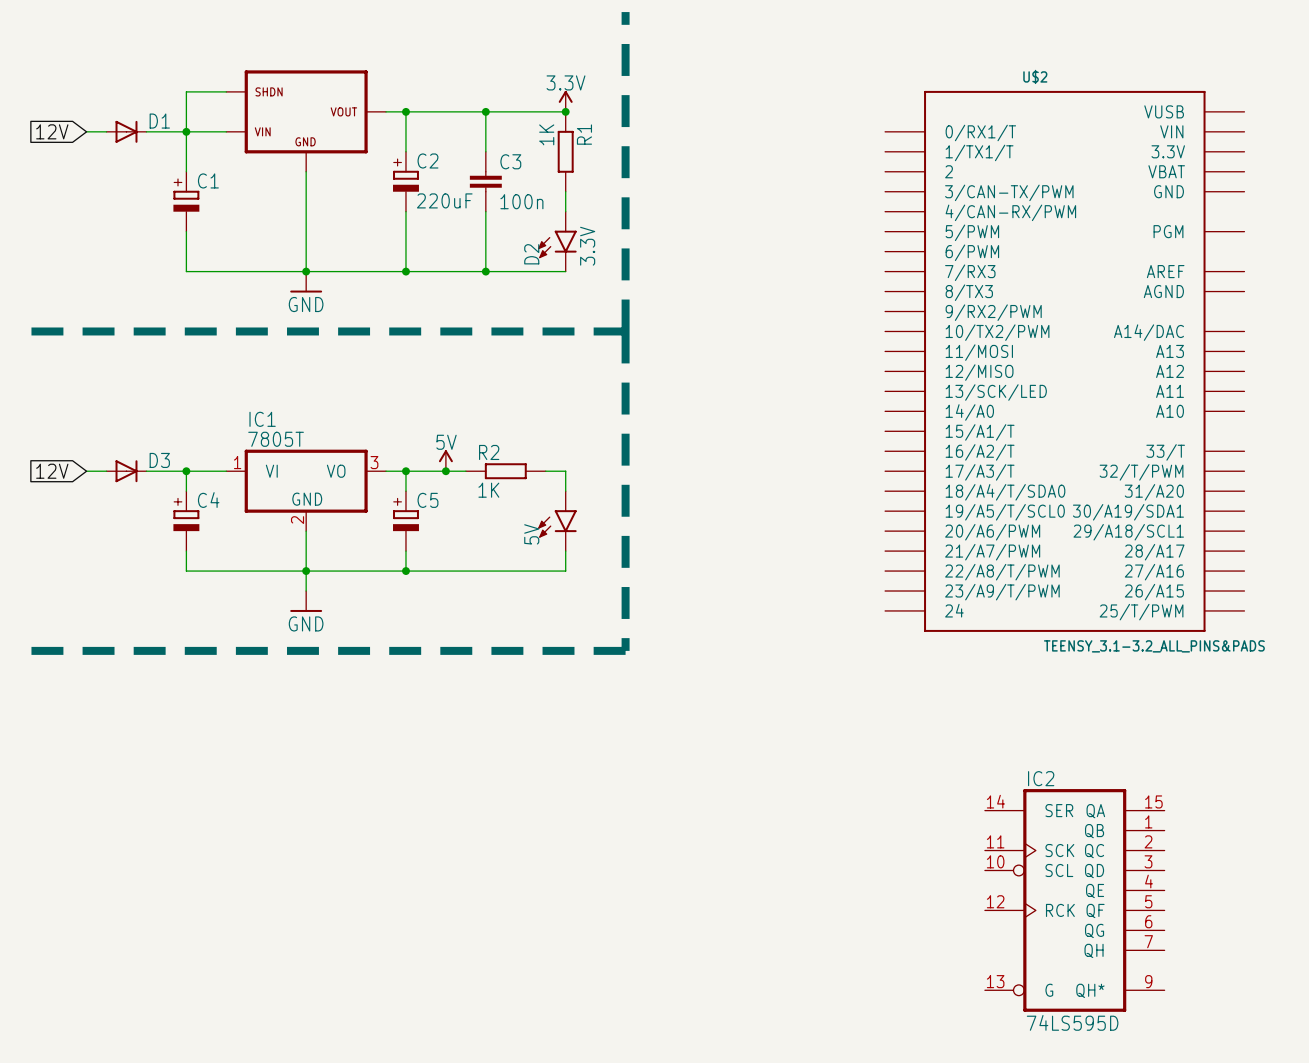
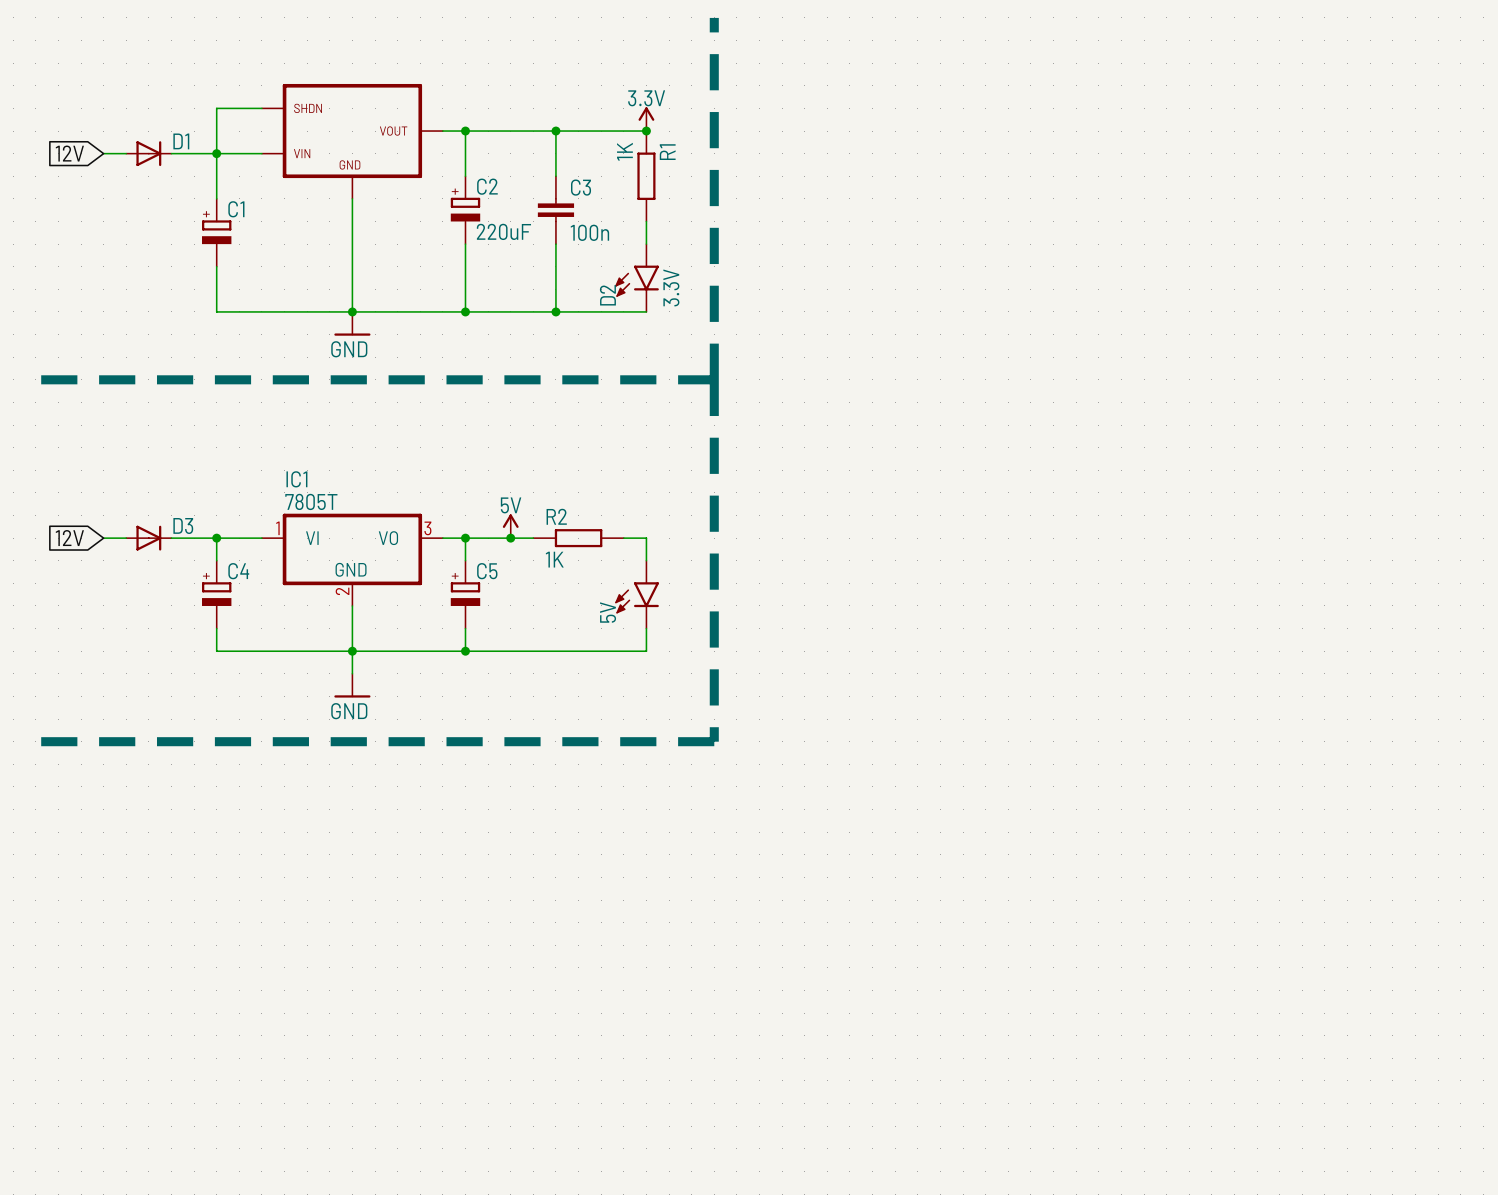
U$2: TEENSY_3.1-3.2_ALL_PINS&PADS (1064, 361) -> none
IC2: 74LS595D (1074, 900) -> none

